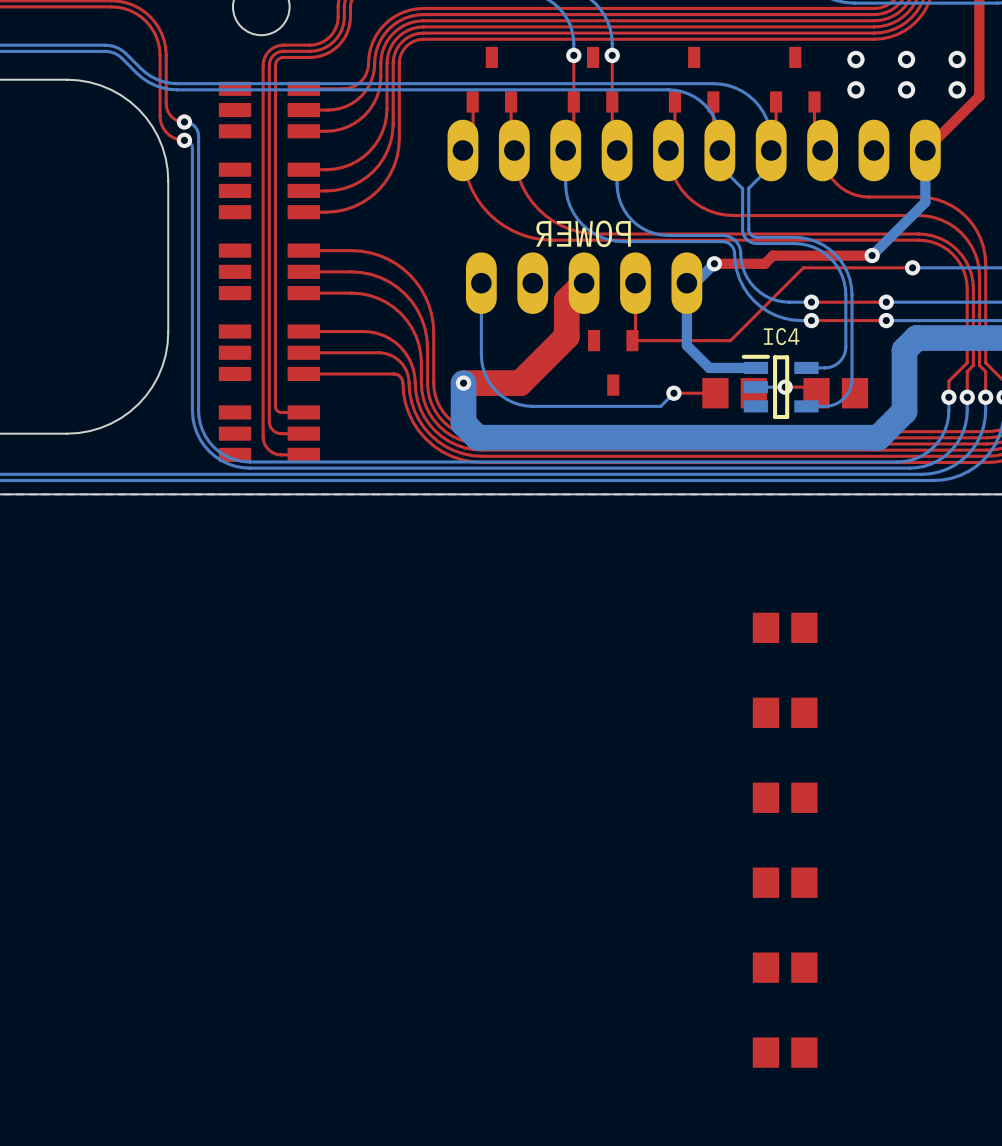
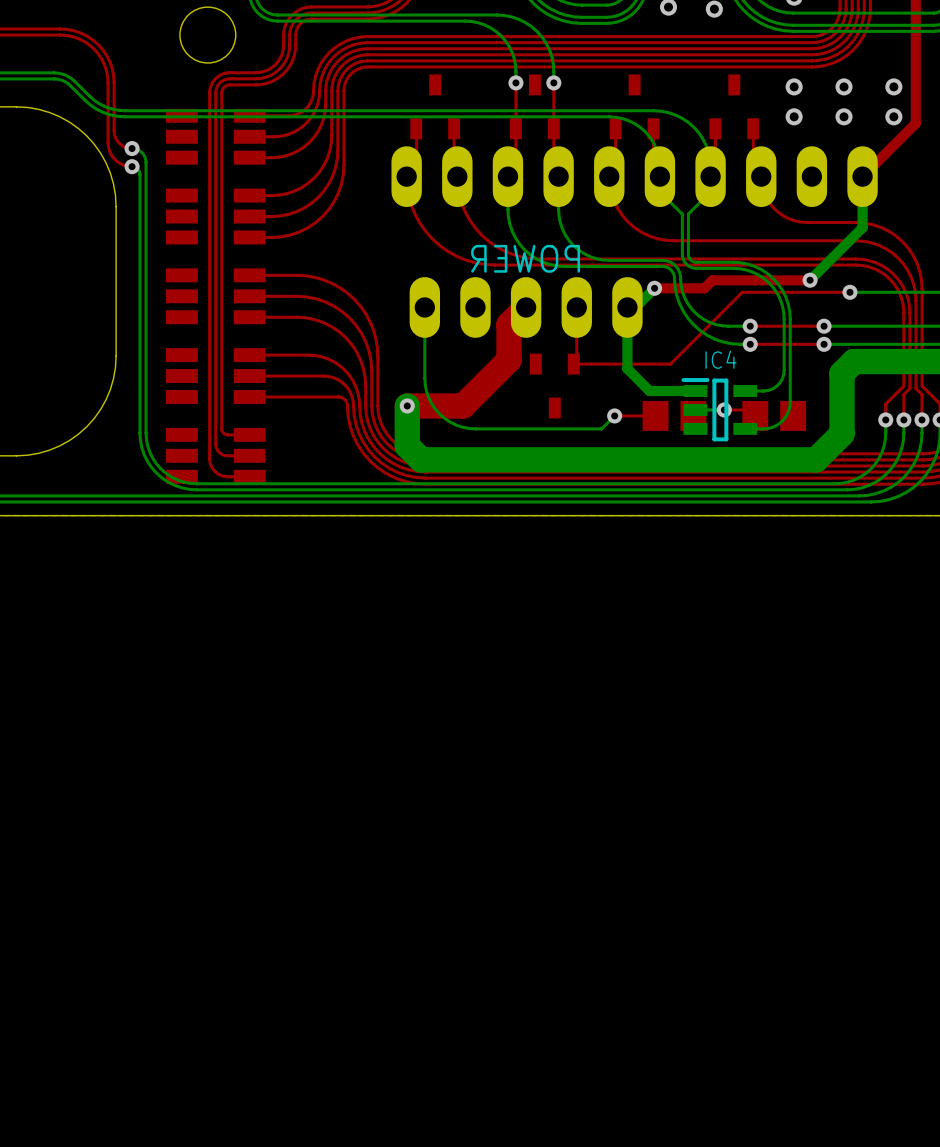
part: (785, 627) -> none
part: (785, 712) -> none
part: (785, 797) -> none
part: (785, 882) -> none
part: (785, 967) -> none
part: (785, 1052) -> none

